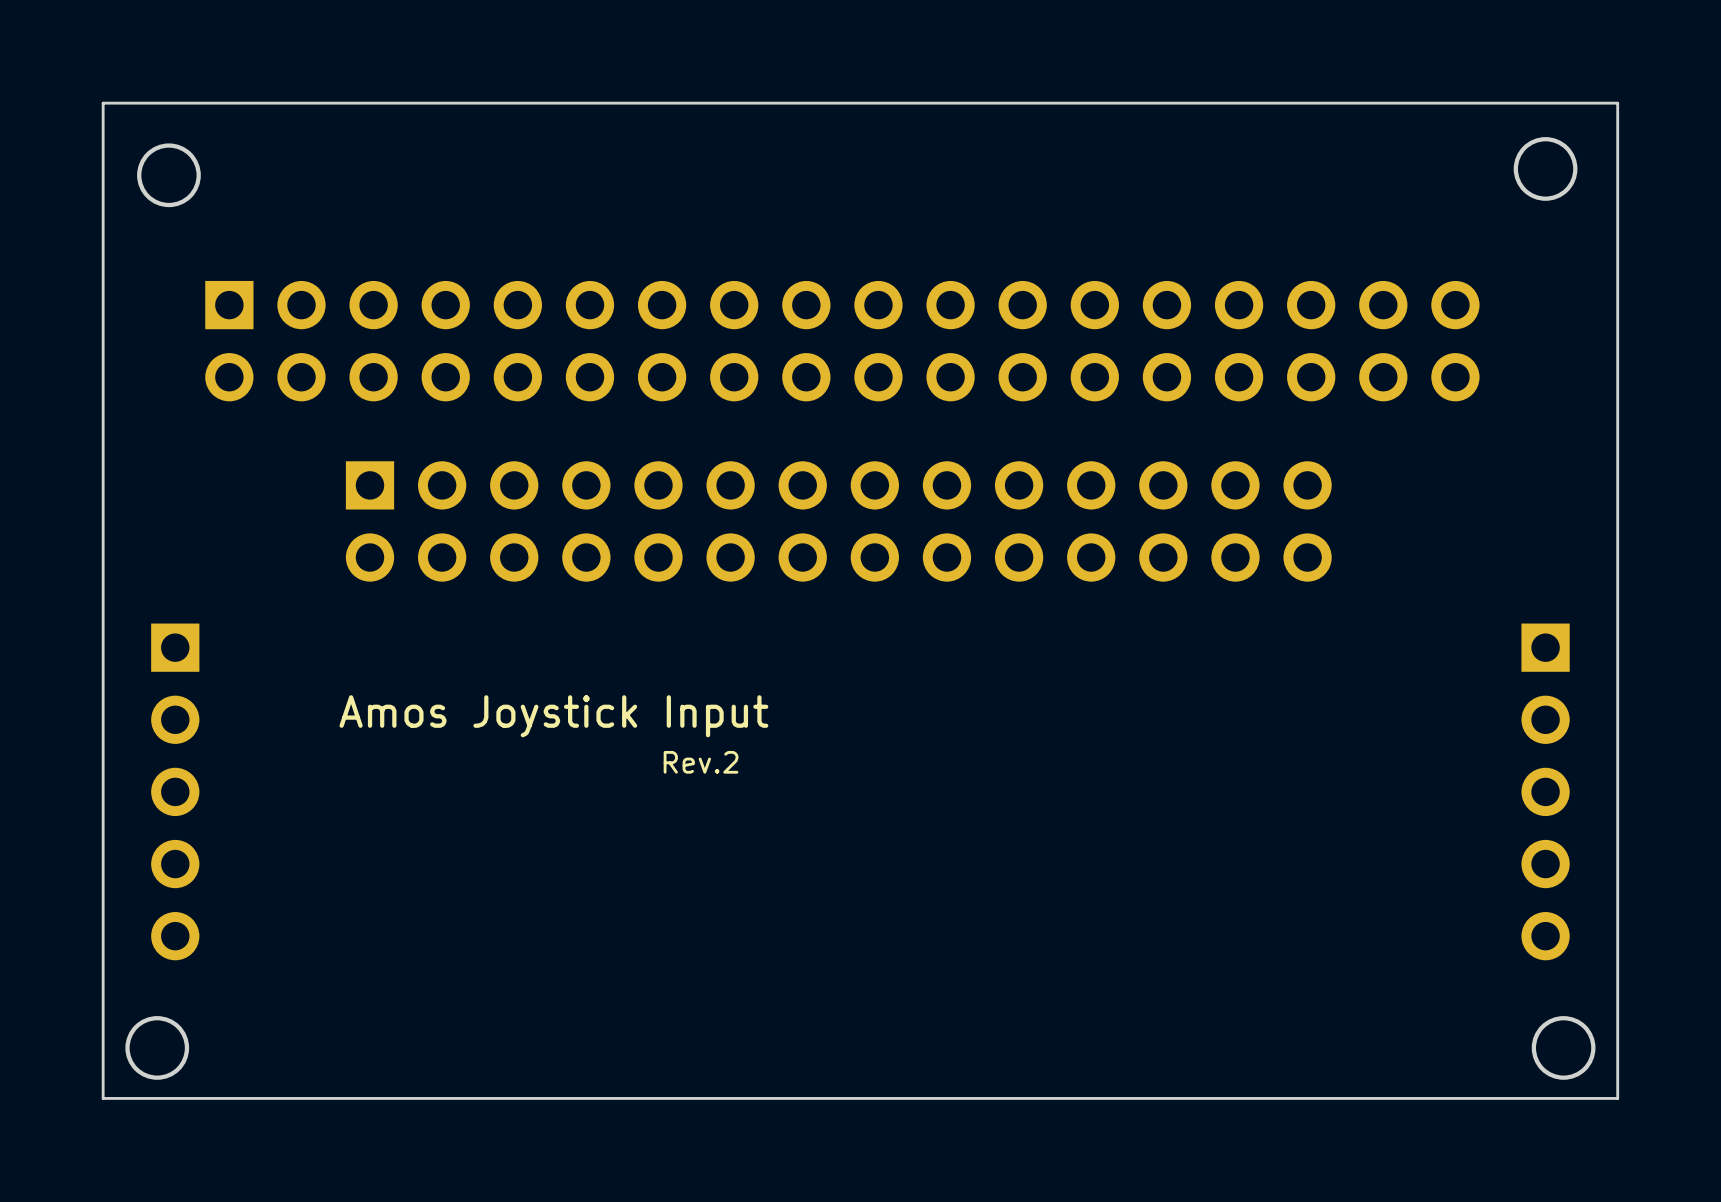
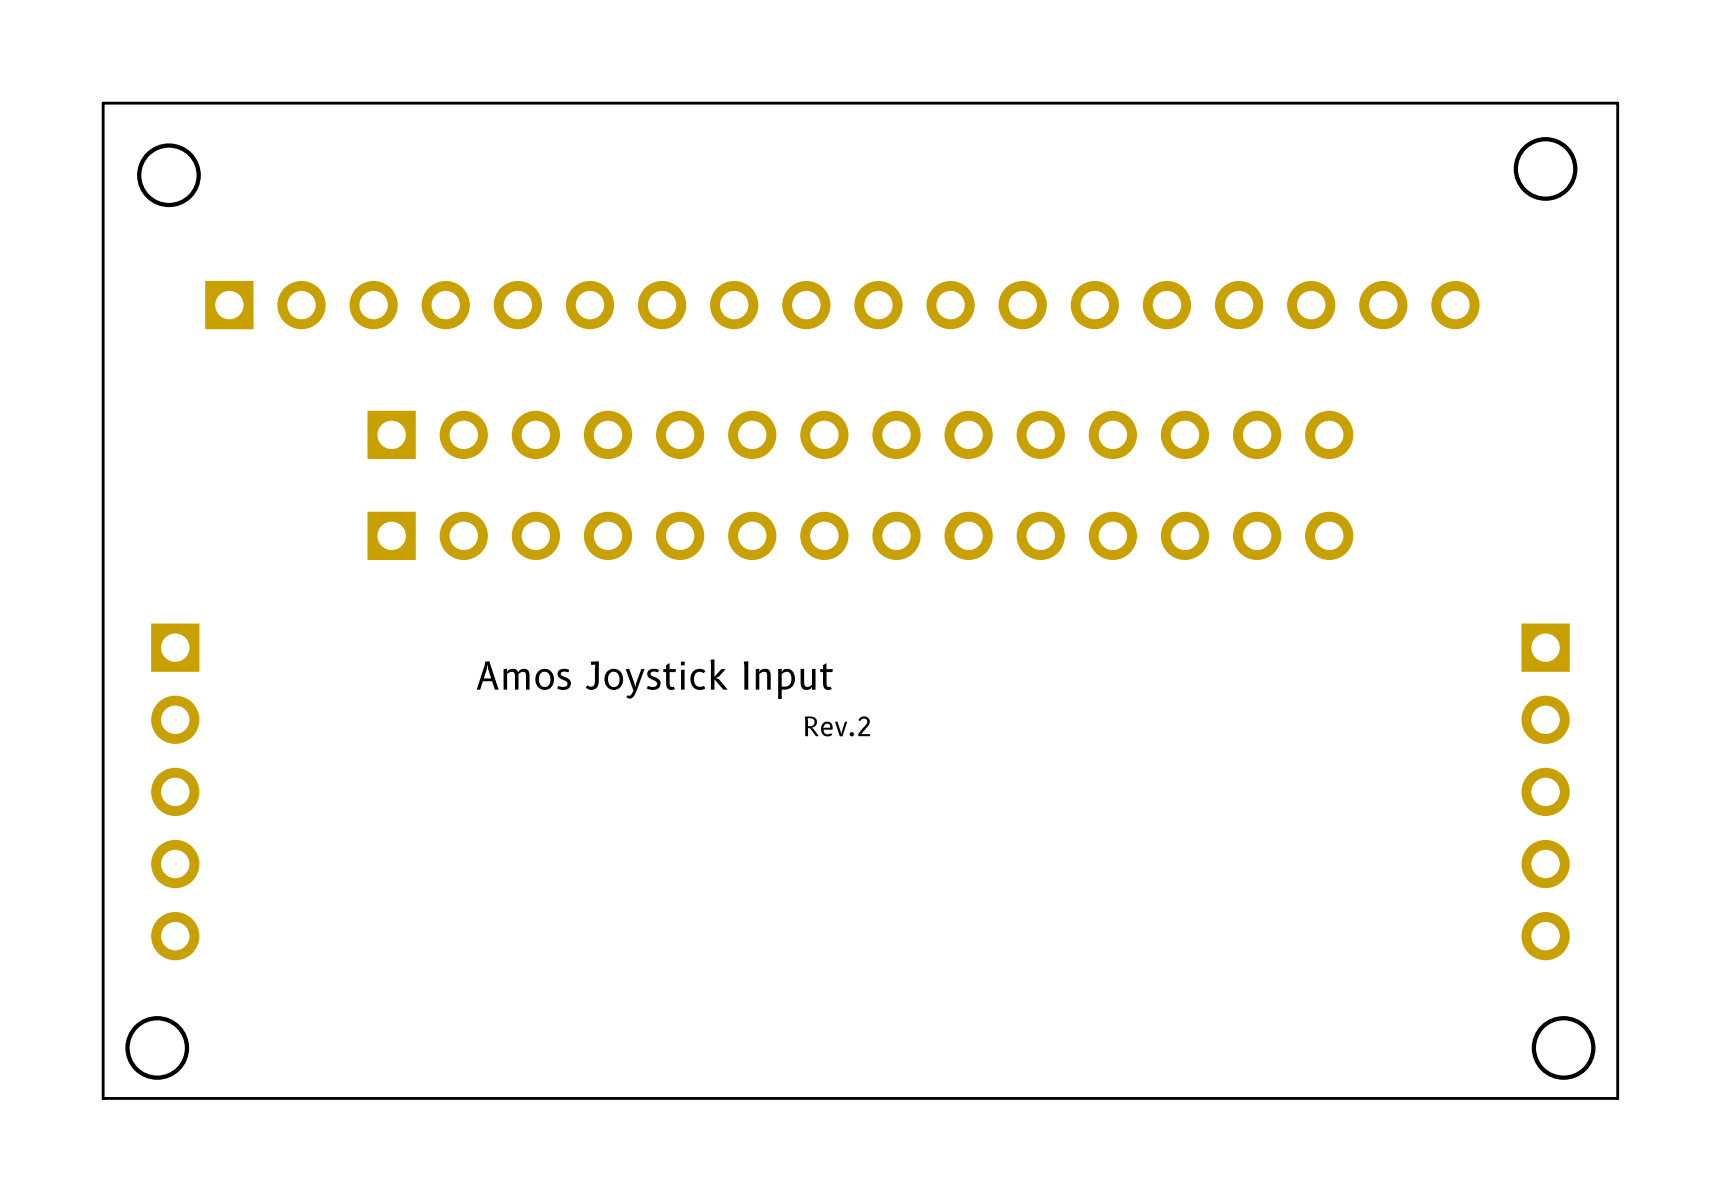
part: (842, 341) -> none
part: none -> (860, 434)
part footprint: [345, 461, 1332, 582] -> [367, 511, 1354, 561]
text position: Amos Joystick Input (553, 716) -> Amos Joystick Input (654, 679)
text position: Rev.2 (701, 762) -> Rev.2 (837, 726)

